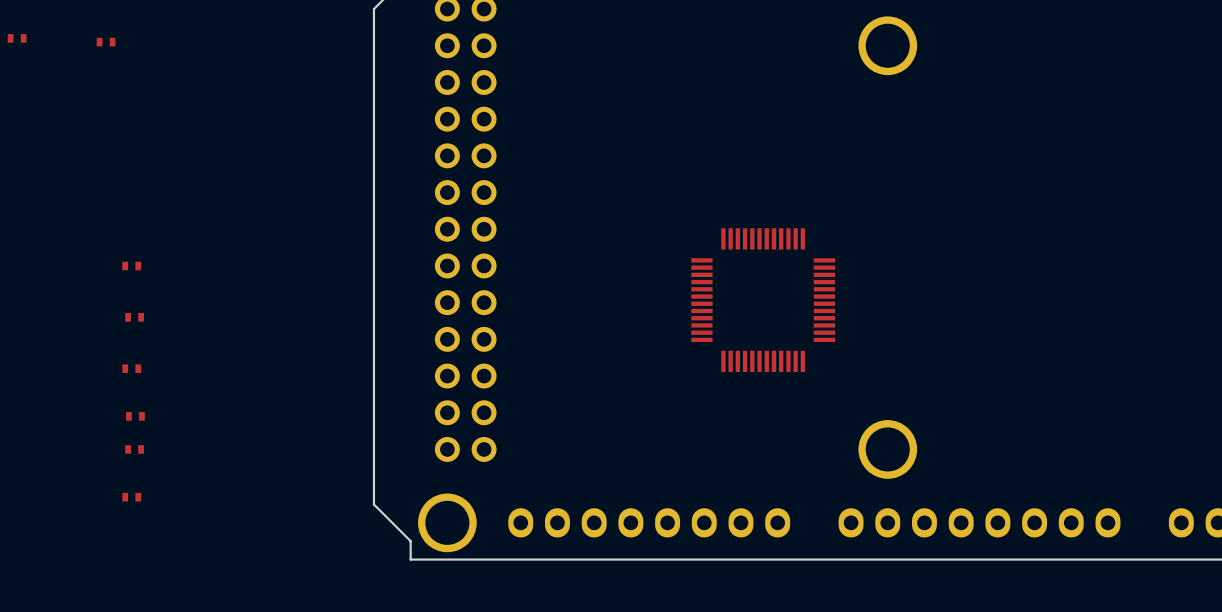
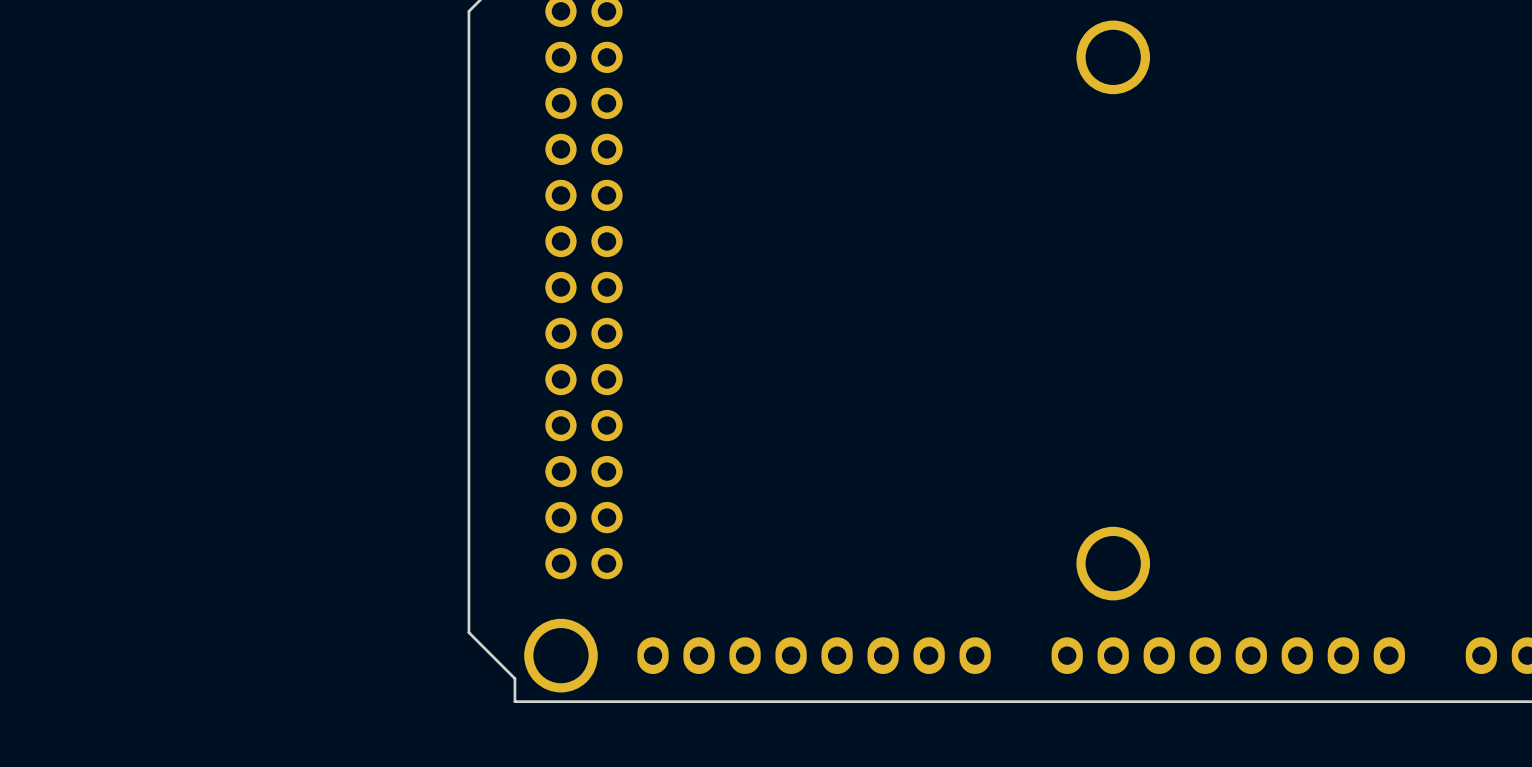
part: (17, 38) -> none
part: (106, 42) -> none
part: (131, 265) -> none
part: (763, 300) -> none
part: (134, 317) -> none
part: (131, 368) -> none
part: (135, 416) -> none
part: (134, 449) -> none
part: (131, 497) -> none

